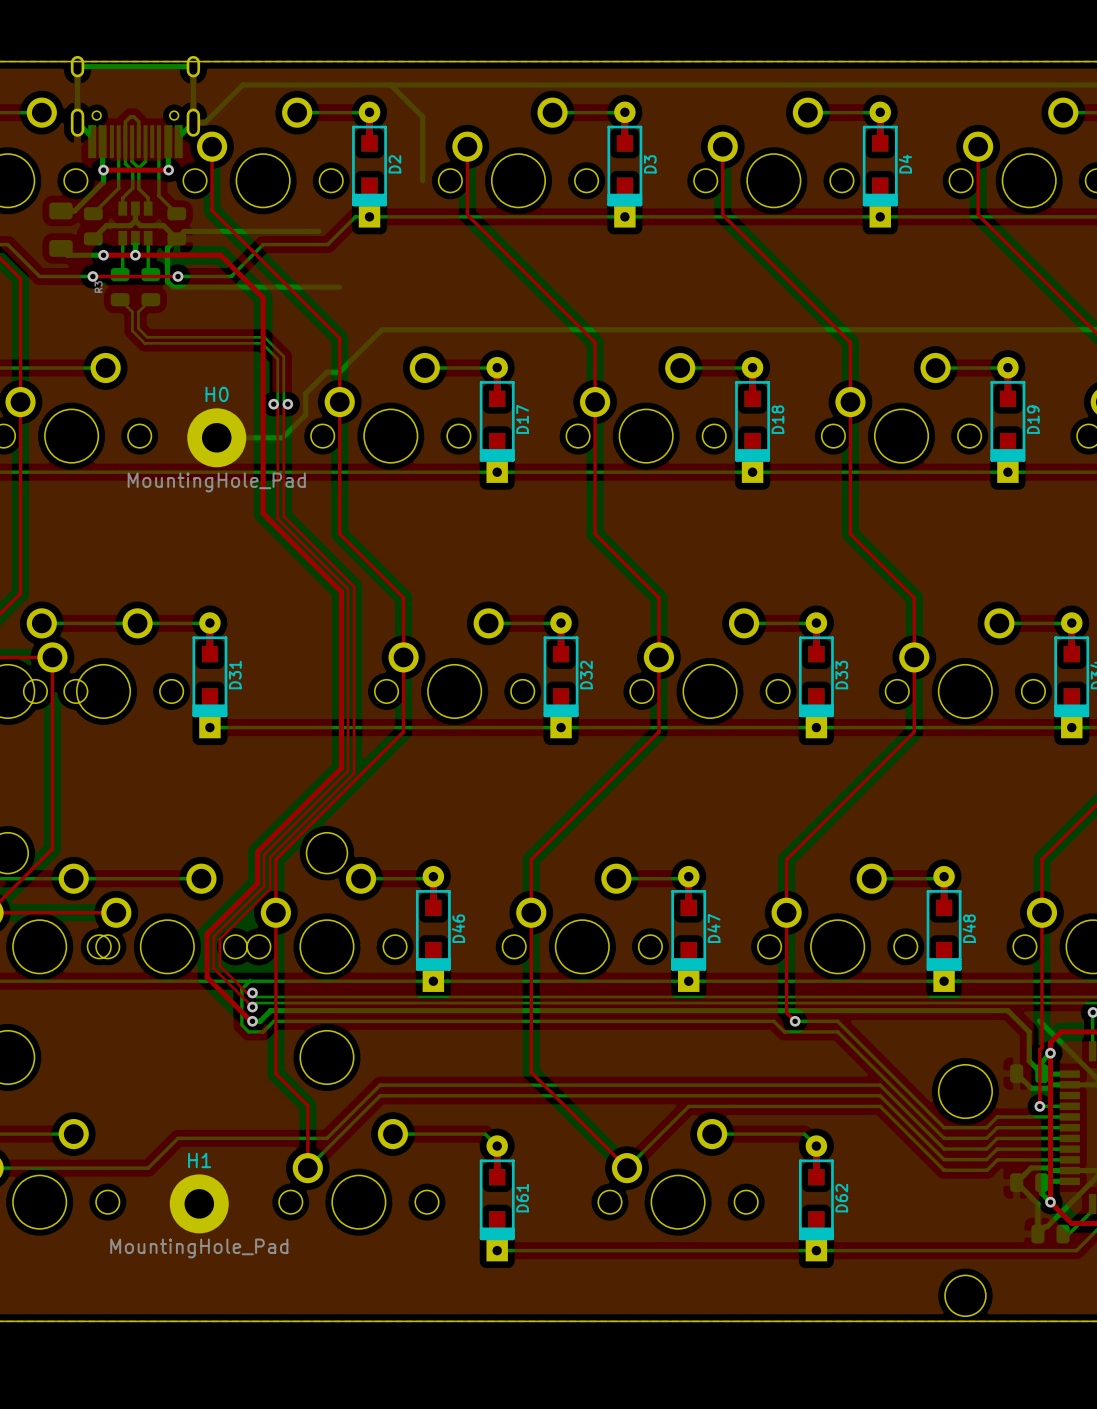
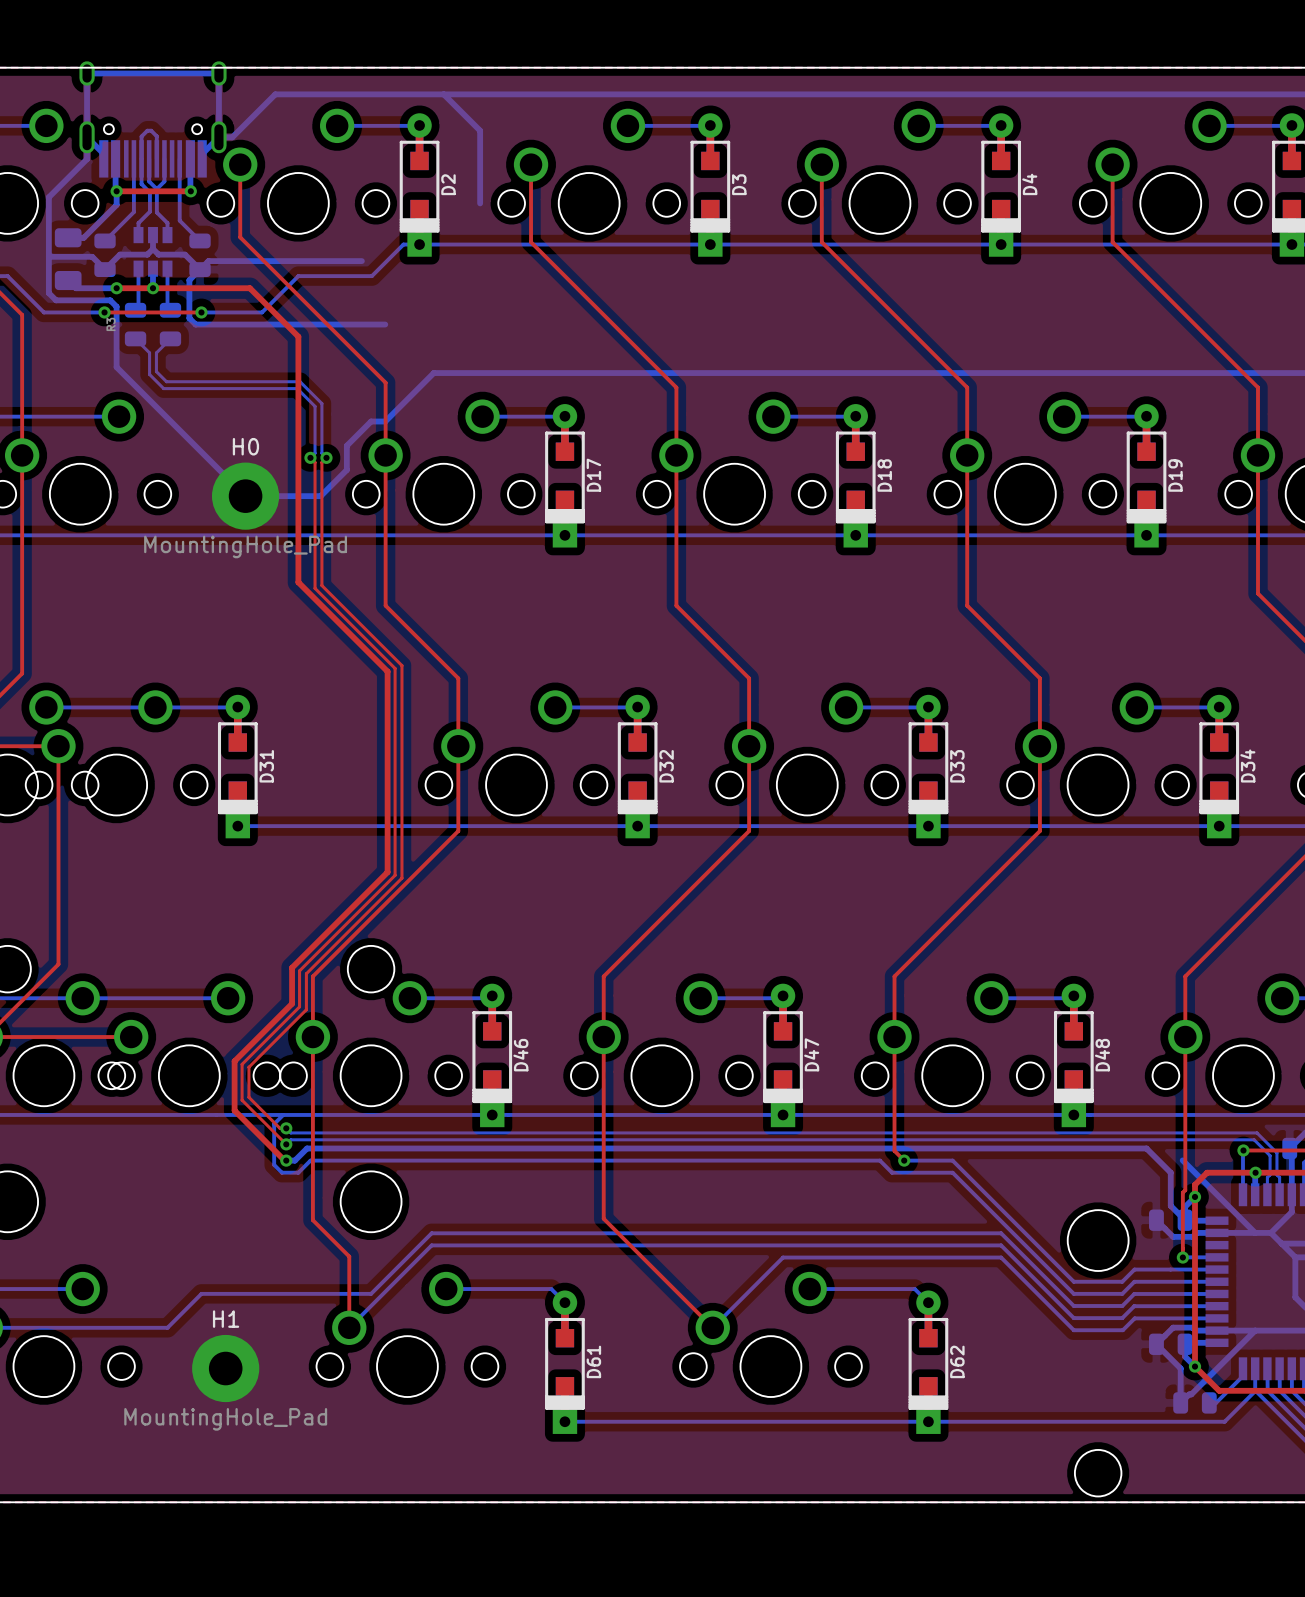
bottom track: none -> (87, 137) (87, 159) (48, 197) (48, 293) (56, 300) (110, 300) (116, 306) (116, 367) (245, 496)
bottom track: none -> (48, 256) (92, 256) (105, 269)

